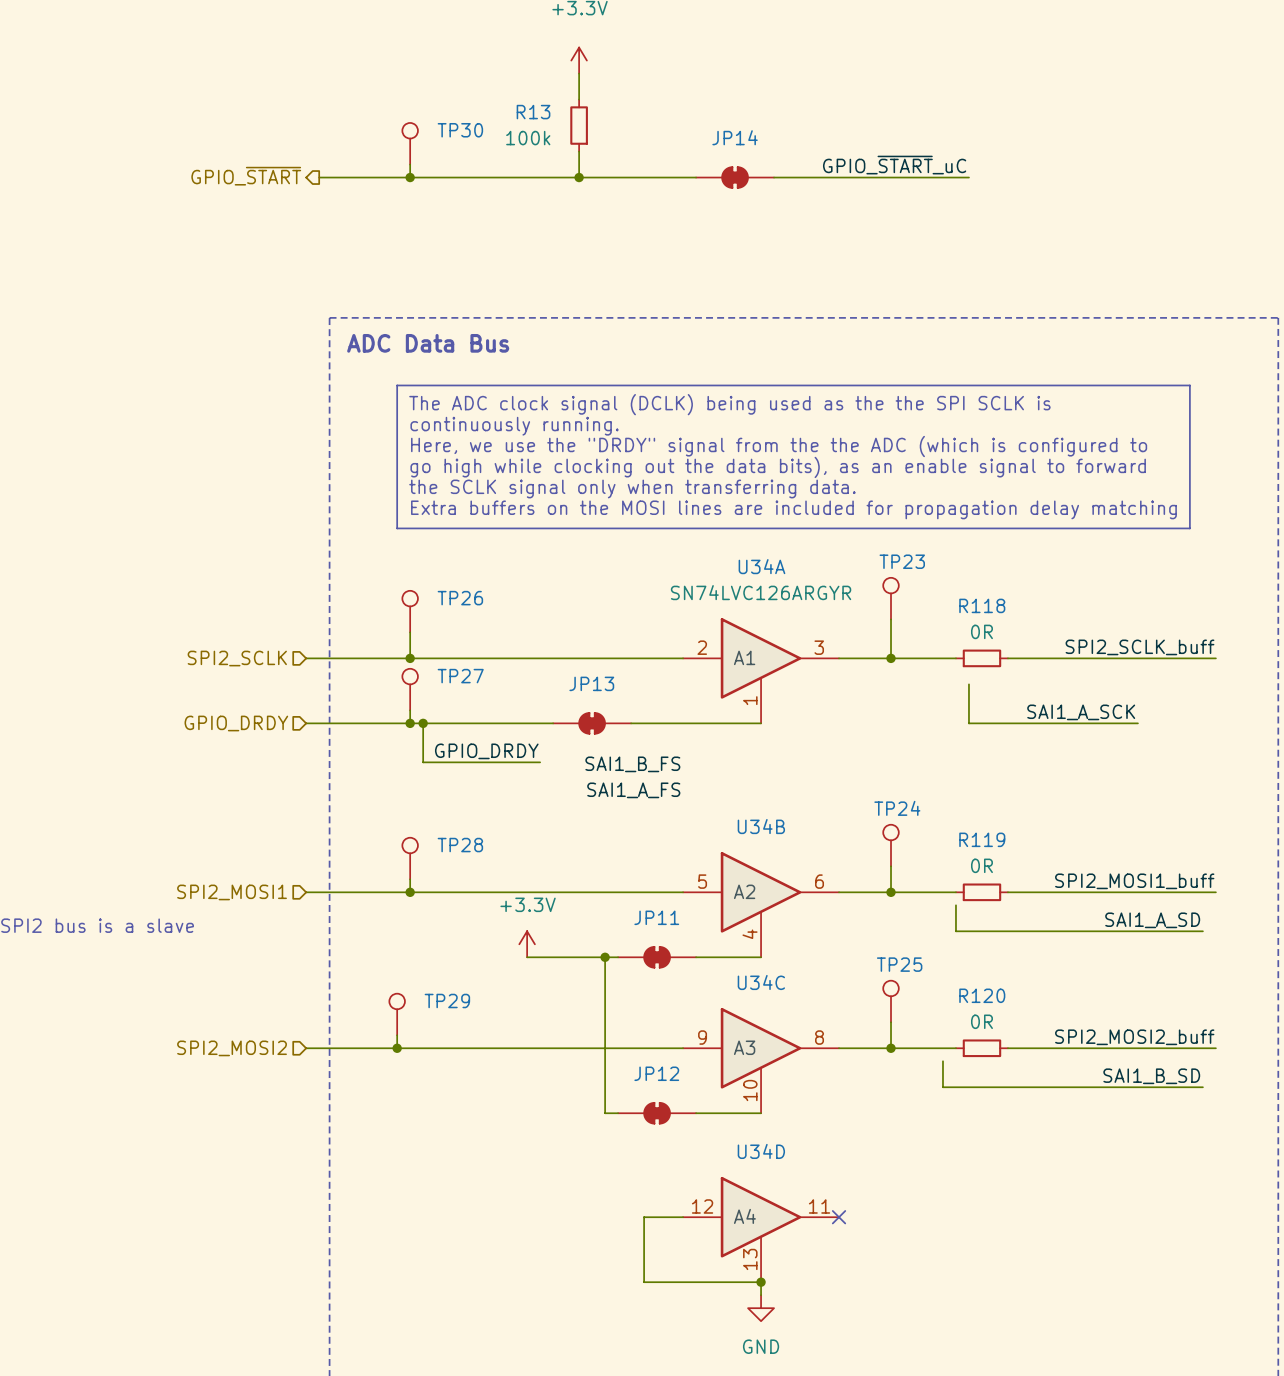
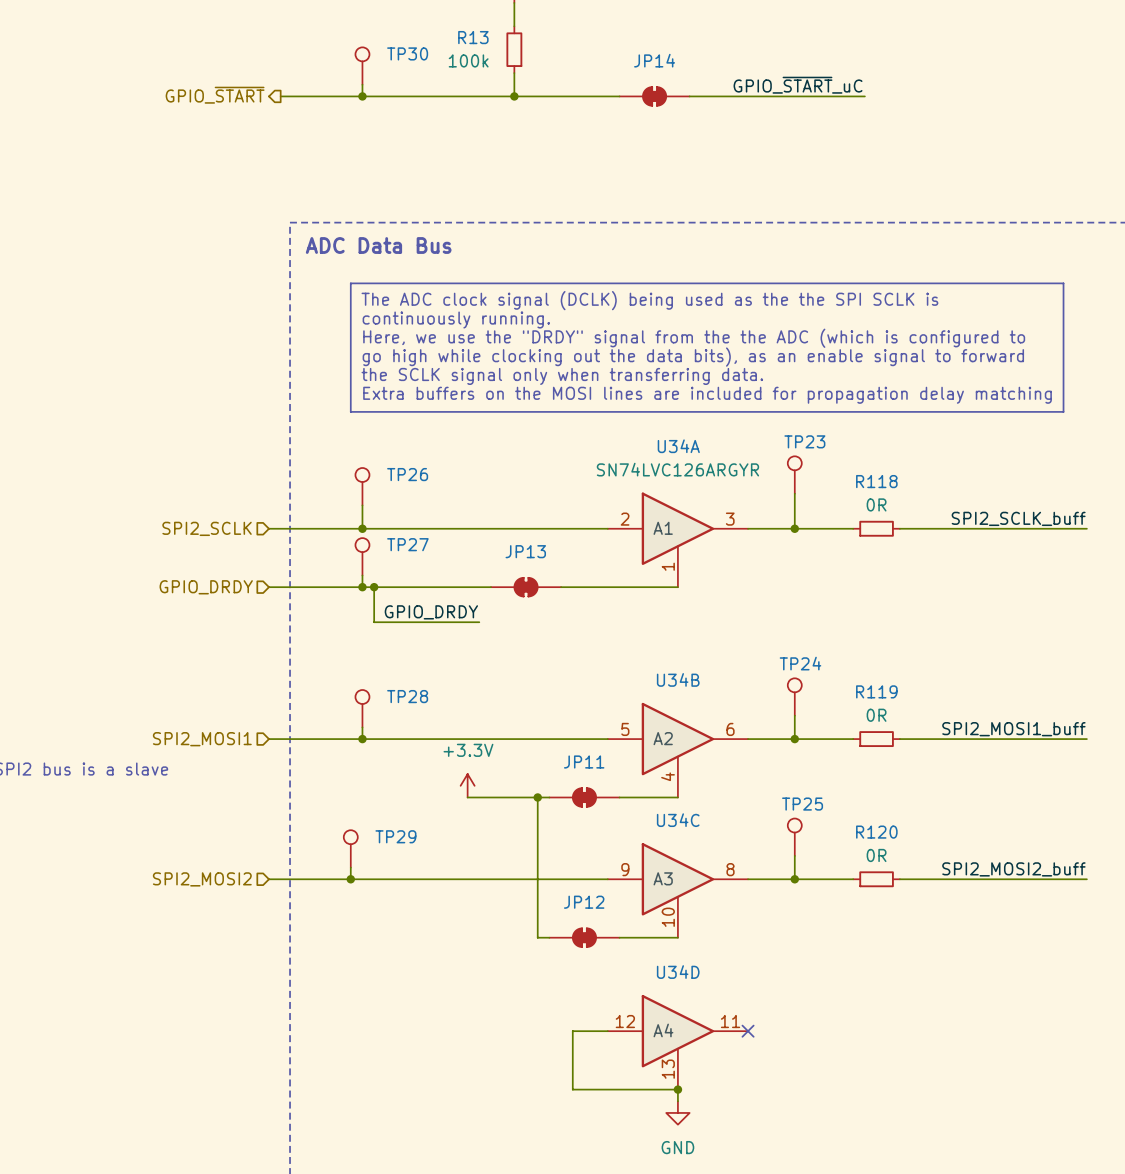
wire: (968, 684) (968, 723) (1137, 723) -> none
label: SAI1_A_SCK (1081, 712) -> none
label: SAI1_B_FS (632, 764) -> none
label: SAI1_A_FS (633, 790) -> none
wire: (955, 905) (955, 931) (1202, 931) -> none
label: SAI1_A_SD (1152, 920) -> none
wire: (942, 1061) (942, 1087) (1202, 1087) -> none
label: SAI1_B_SD (1151, 1076) -> none

